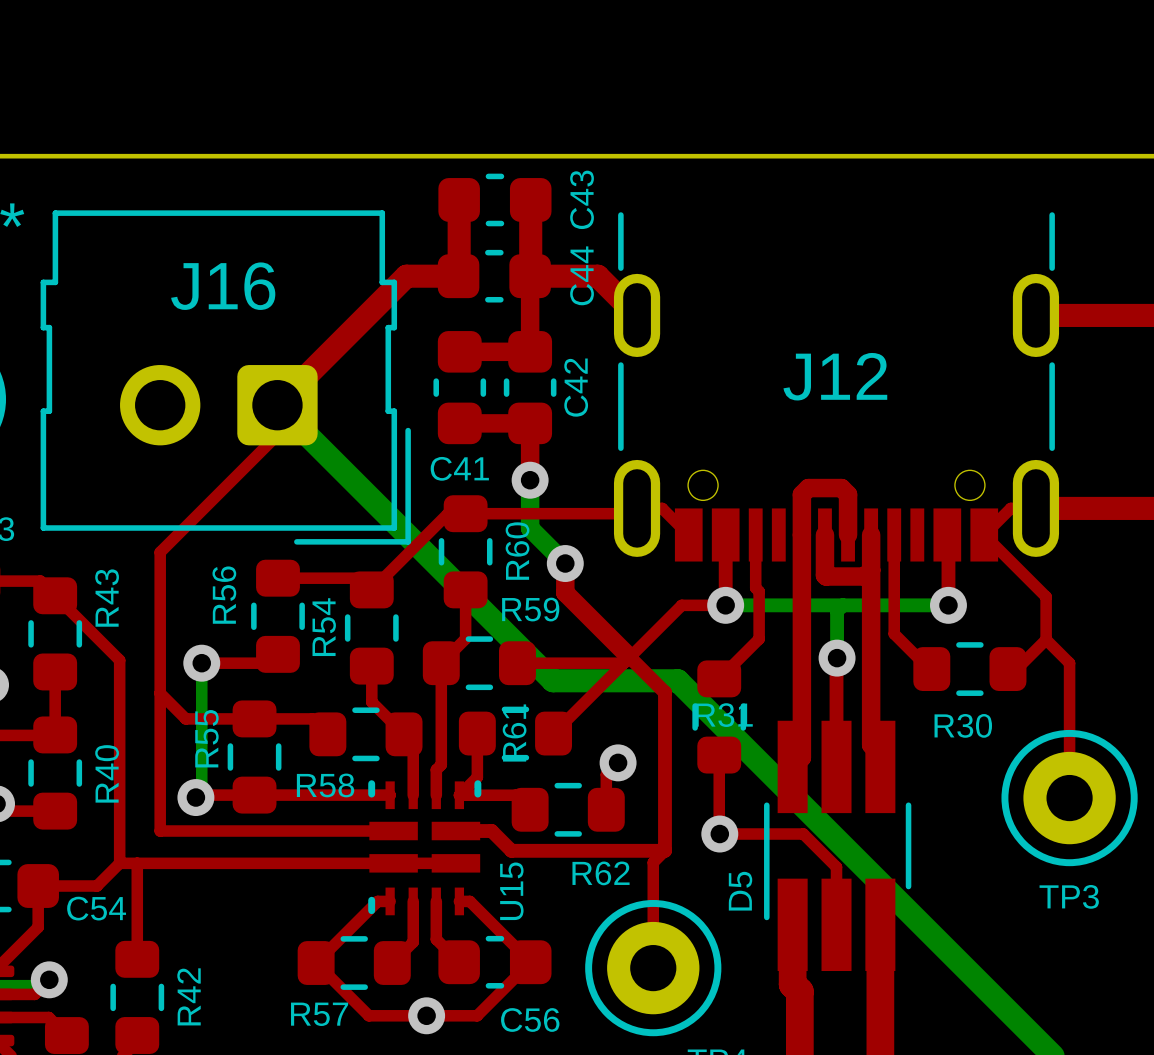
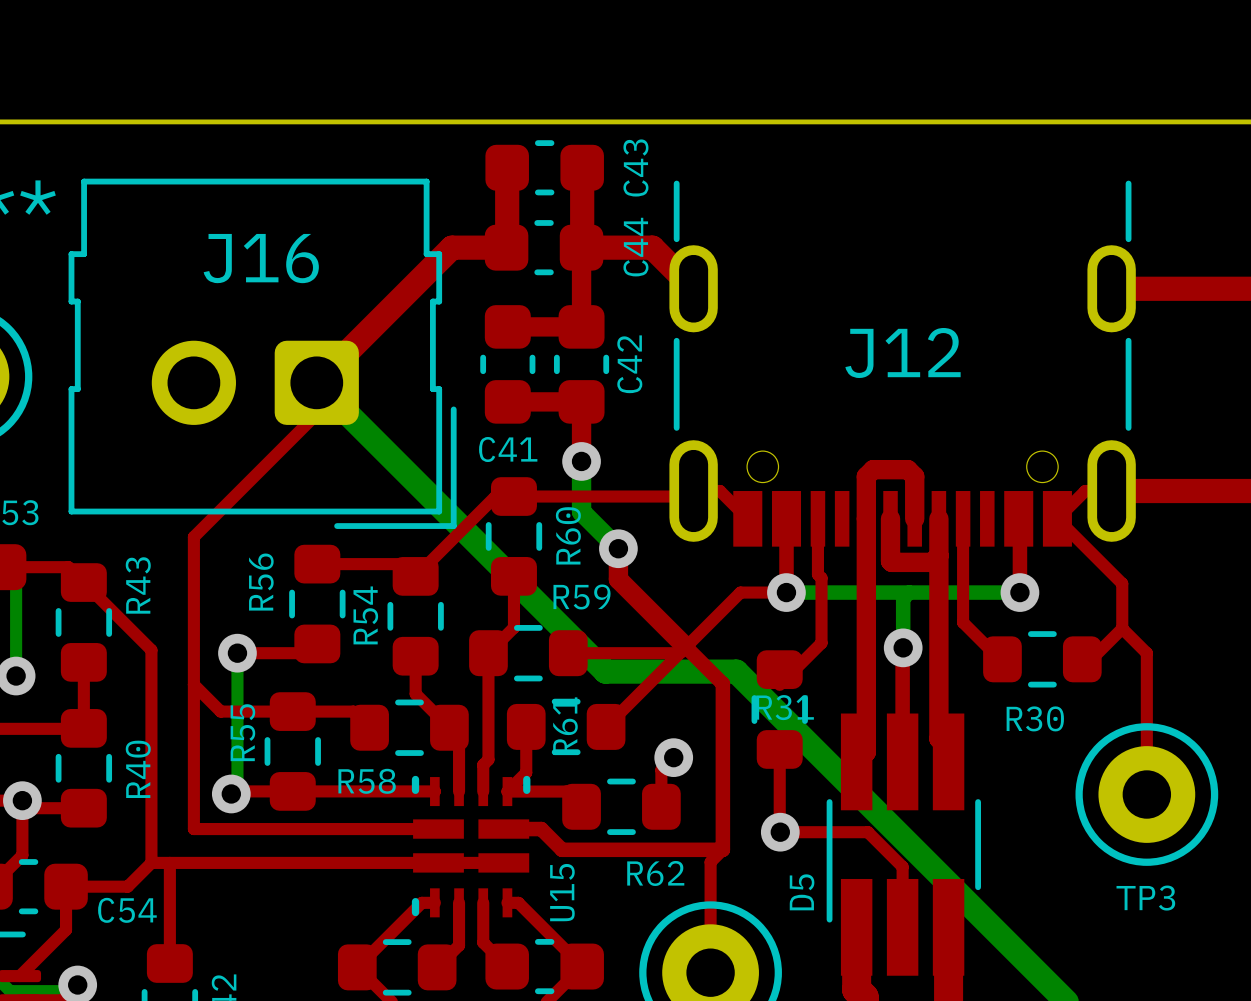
top track: (759, 639) (719, 678) -> (821, 627) (821, 643) (779, 684)

